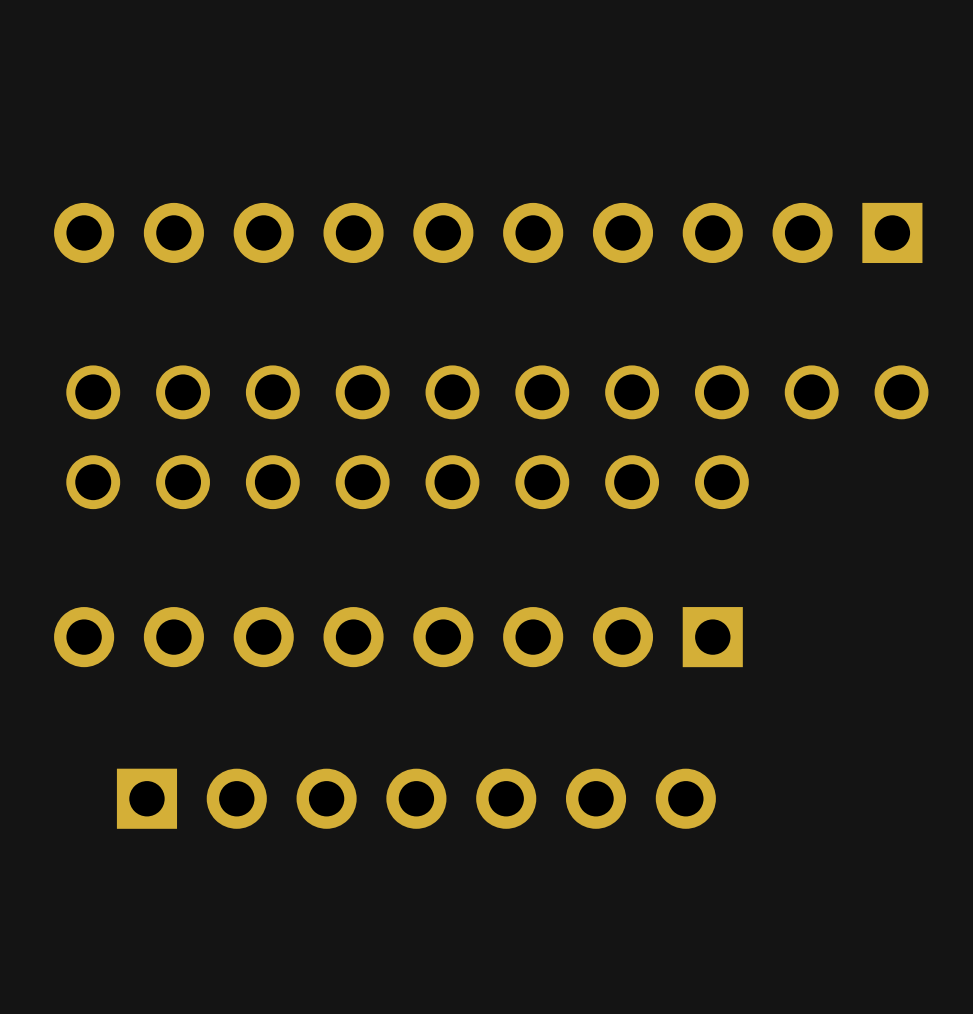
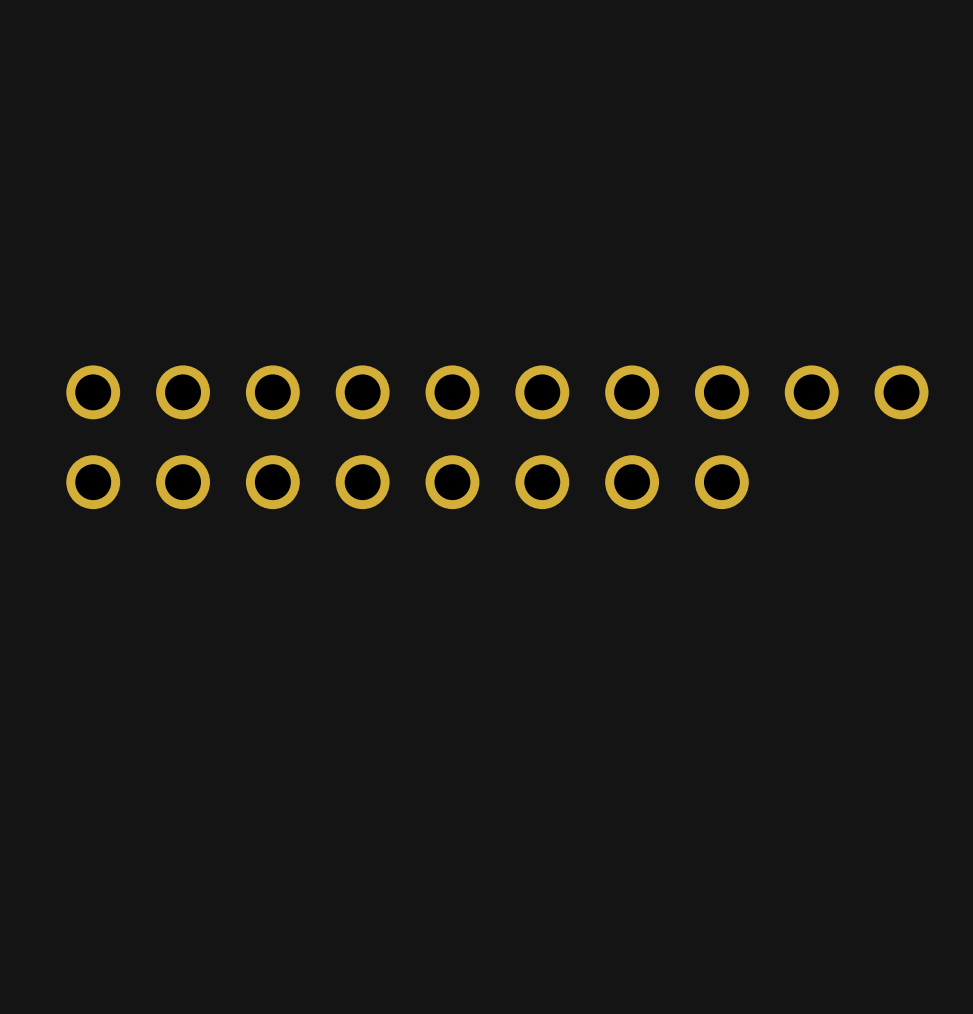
part: (488, 232) -> none
part: (398, 637) -> none
part: (416, 798) -> none

